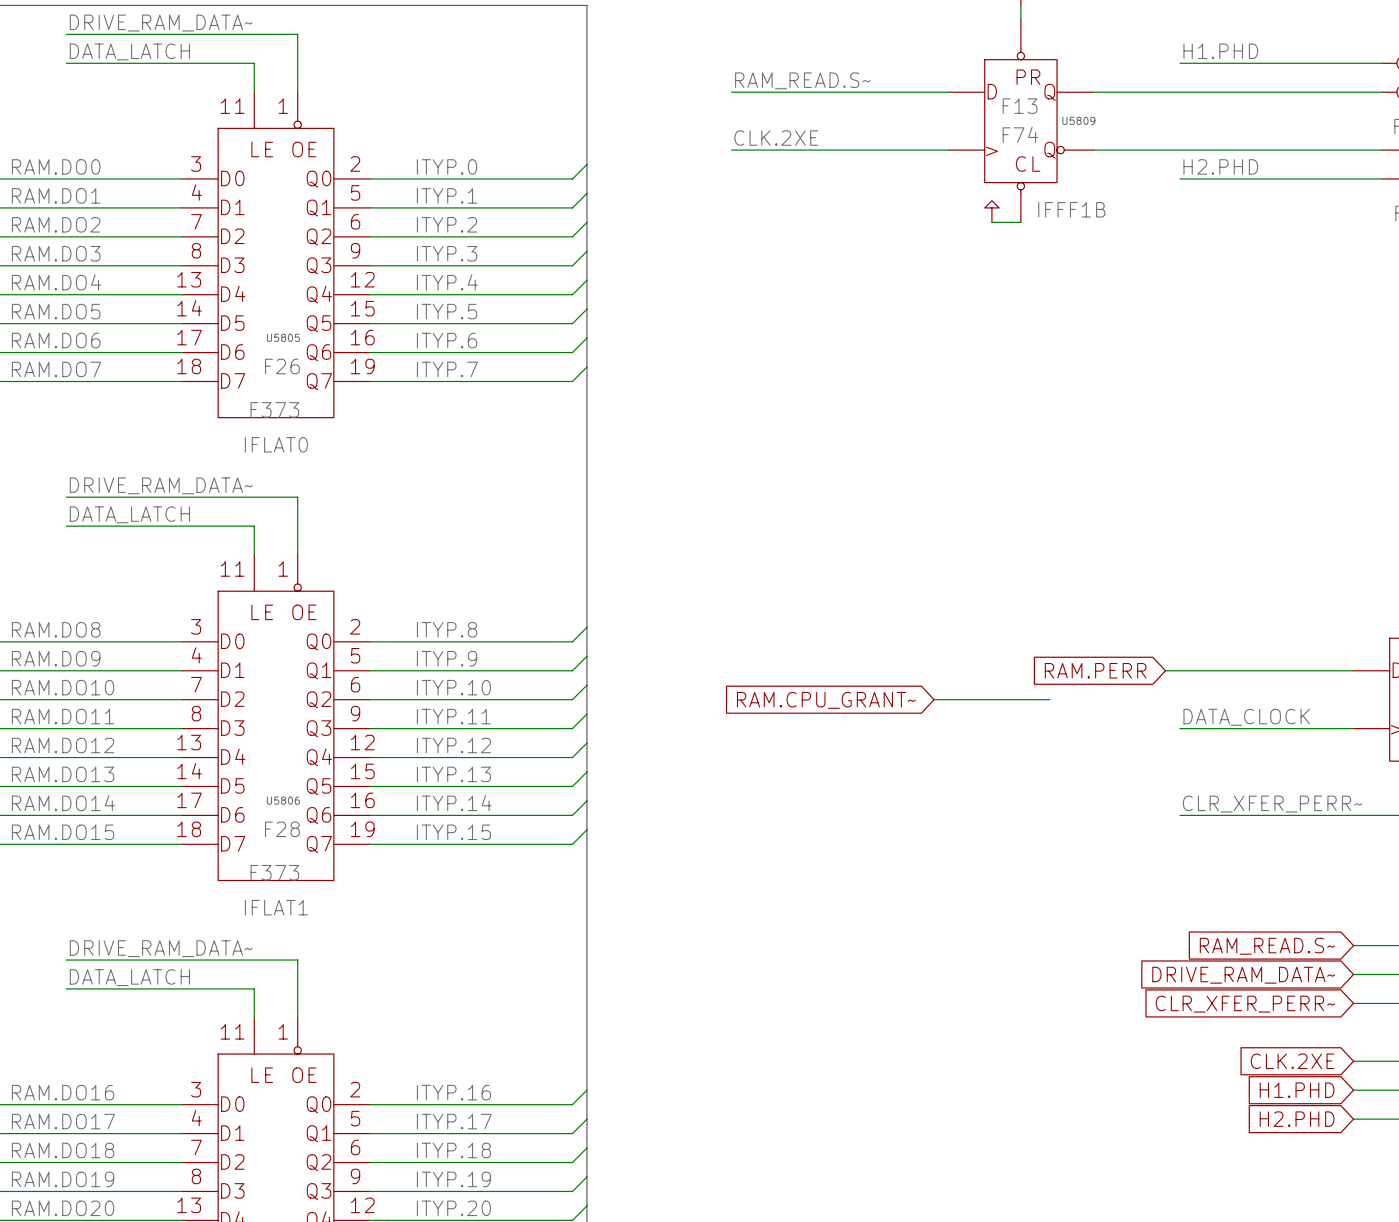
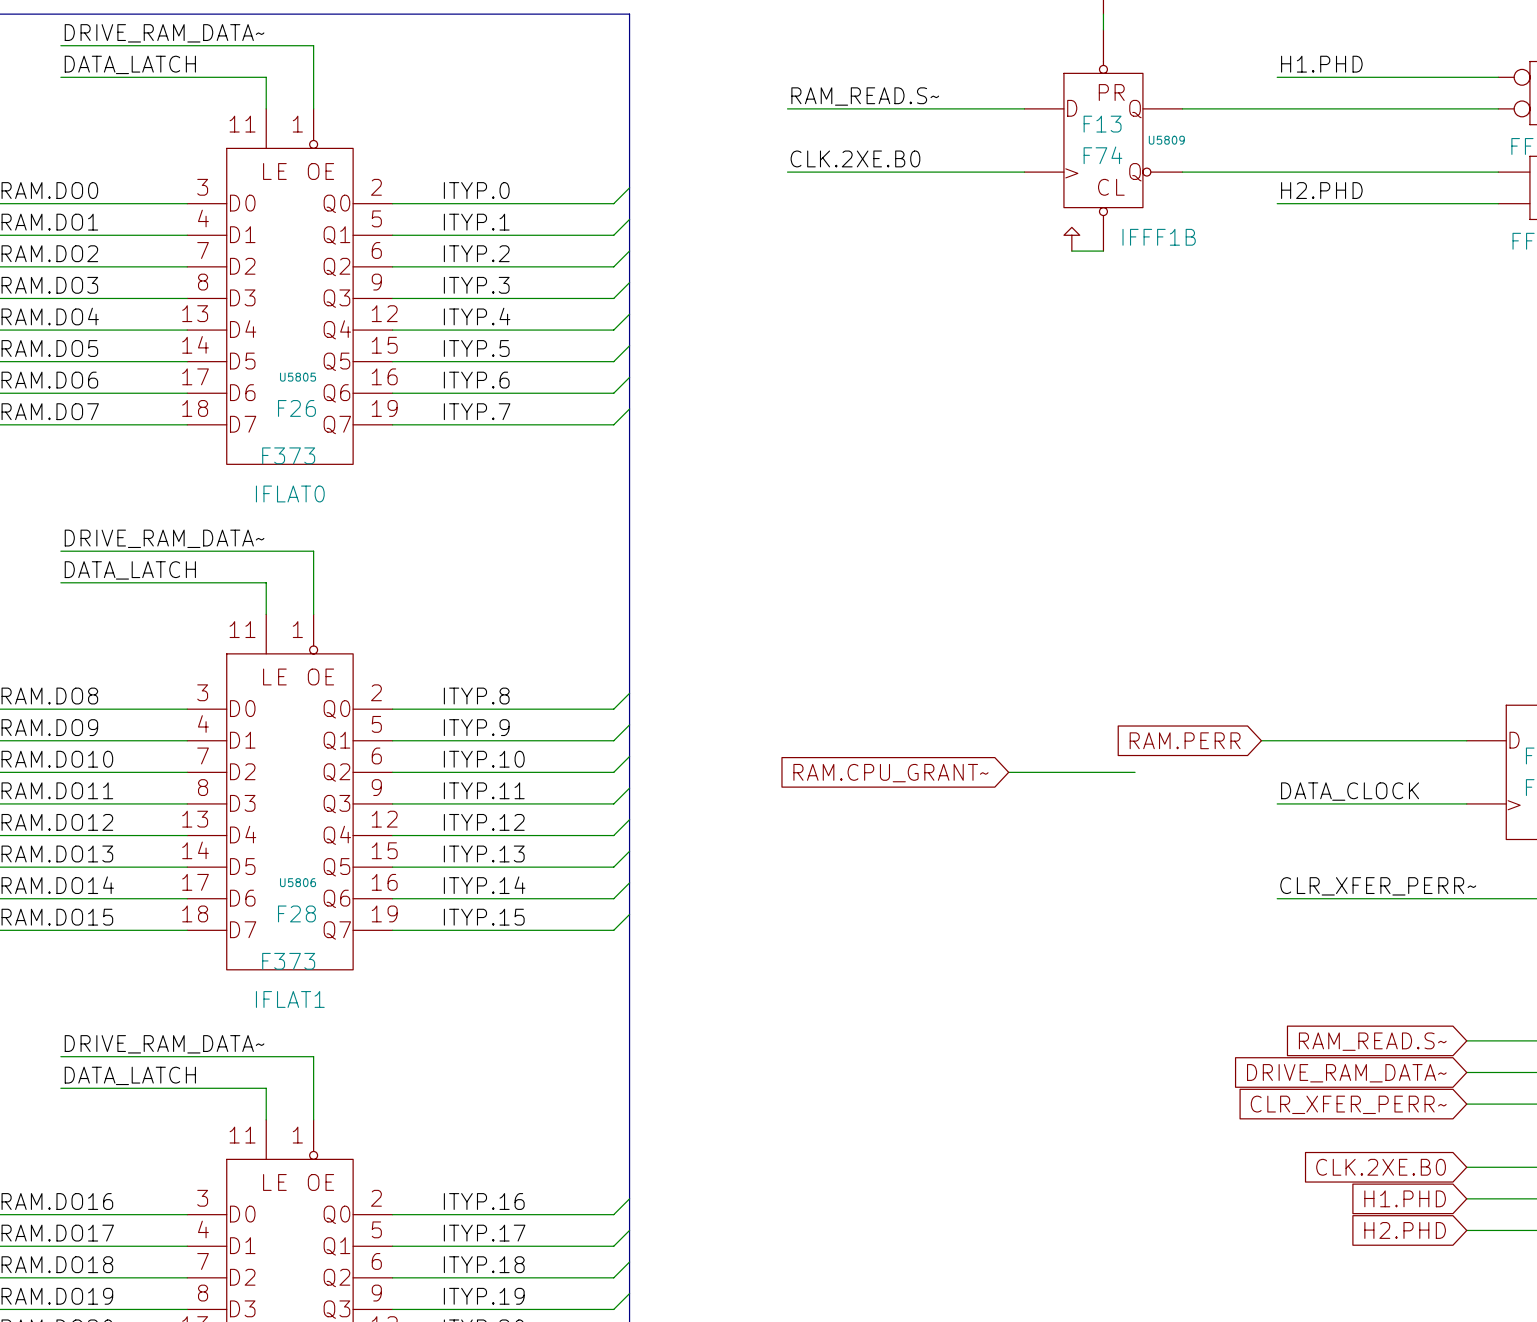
label: CLK.2XE (776, 138) -> CLK.2XE.B0 (855, 158)
global label: CLK.2XE (1292, 1061) -> CLK.2XE.B0 (1381, 1167)

